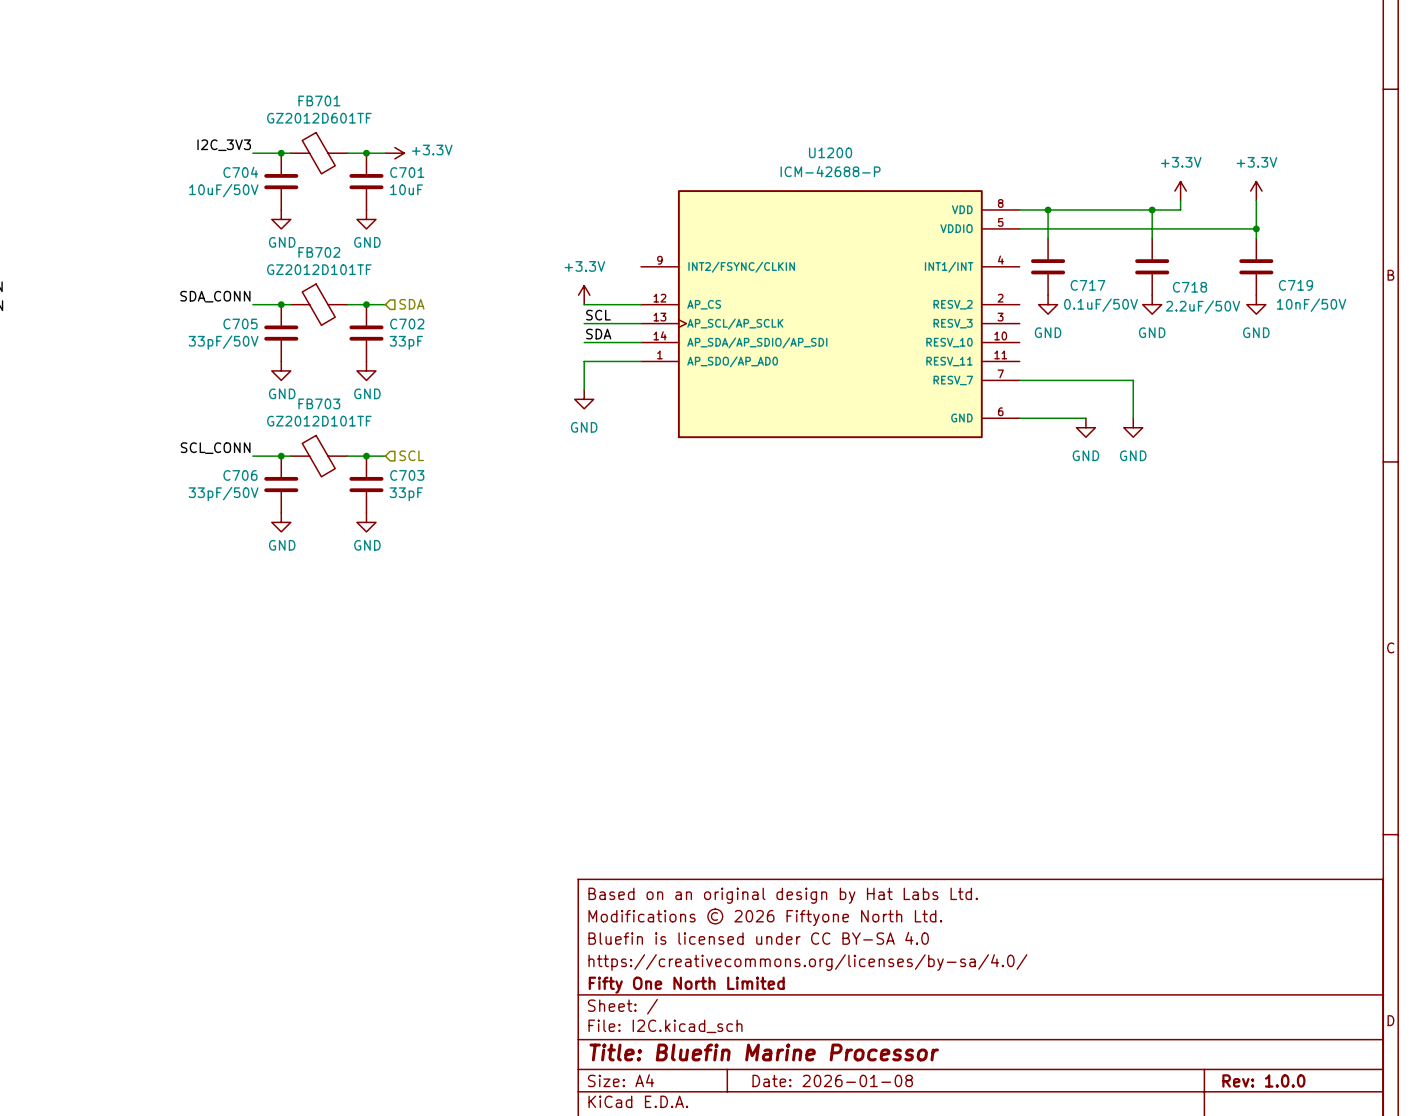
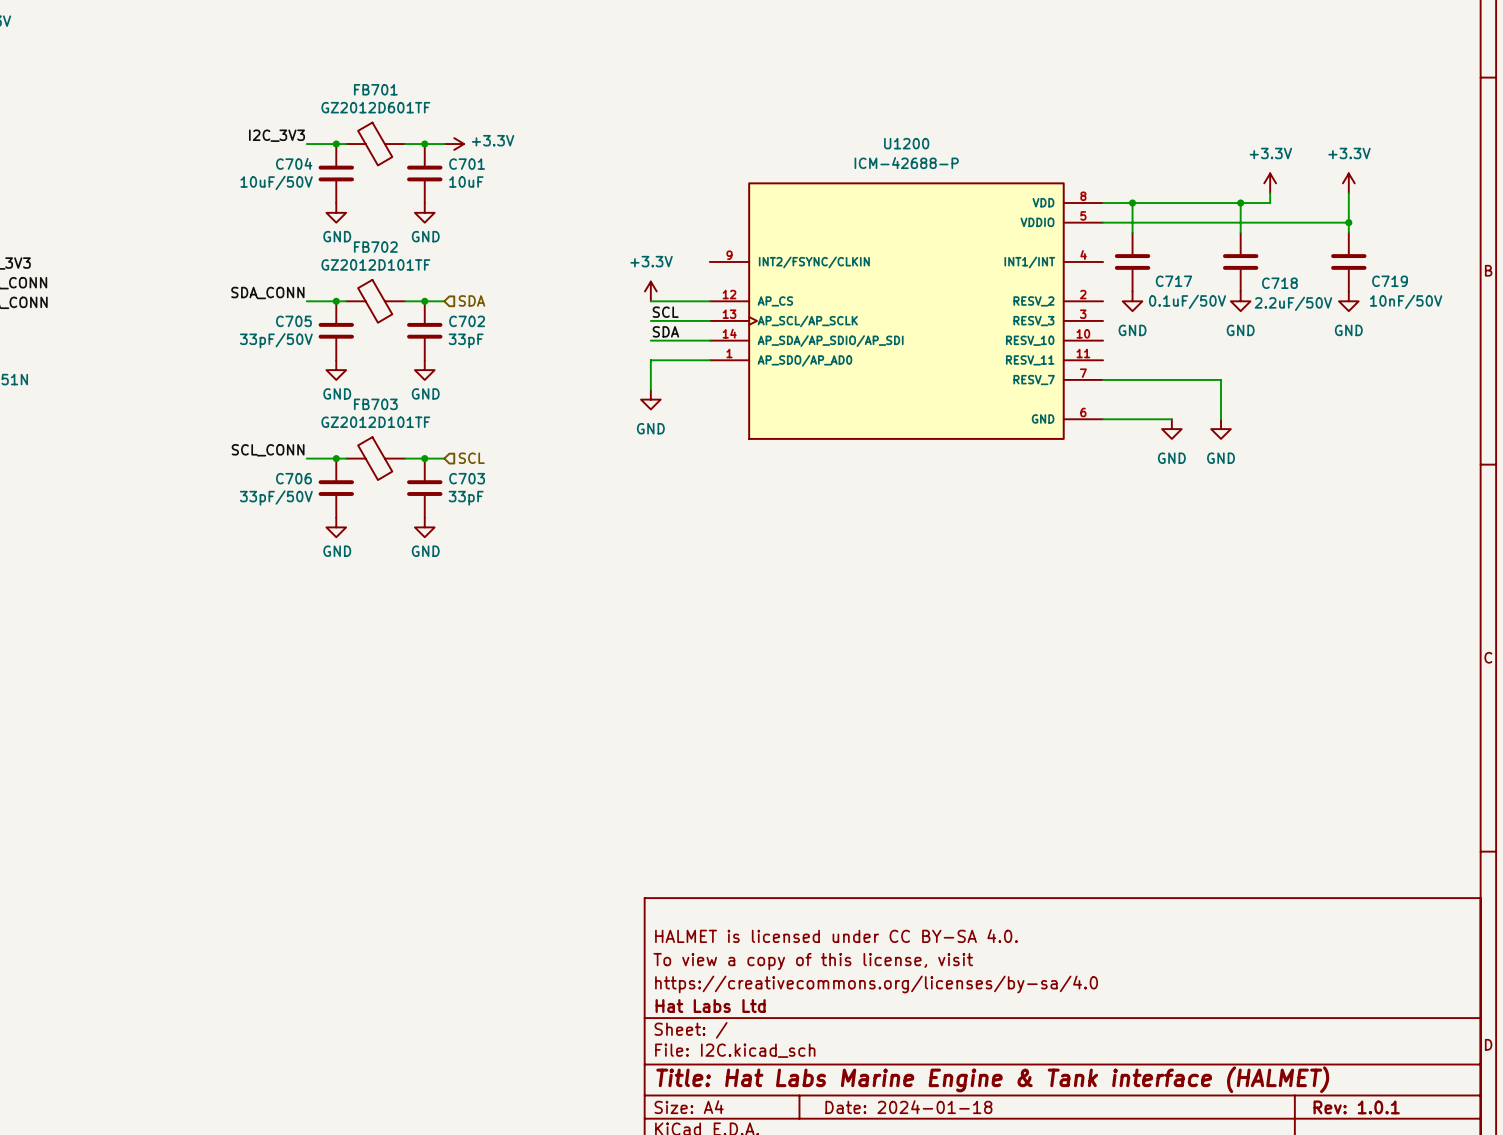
title block: Based on an original design by Hat Labs Ltd. (783, 895) -> none
title block: Modifications © 2026 Fiftyone North Ltd. (765, 917) -> HALMET is licensed under CC BY-SA 4.0. (836, 936)
title block: Bluefin is licensed under CC BY-SA 4.0 (758, 938) -> To view a copy of this license, visit (813, 961)
title block: https://creativecommons.org/licenses/by-sa/4.0/ (807, 962) -> https://creativecommons.org/licenses/by-sa/4.0 (876, 984)
title block: Fifty One North Limited (686, 985) -> Hat Labs Ltd (710, 1006)
title block: Title: Bluefin Marine Processor (764, 1052) -> Title: Hat Labs Marine Engine & Tank interface (HALMET) (992, 1079)
title block: Date: 2026-01-08 (832, 1080) -> Date: 2024-01-18 (908, 1107)
title block: Rev: 1.0.0 (1263, 1080) -> Rev: 1.0.1 (1356, 1107)

